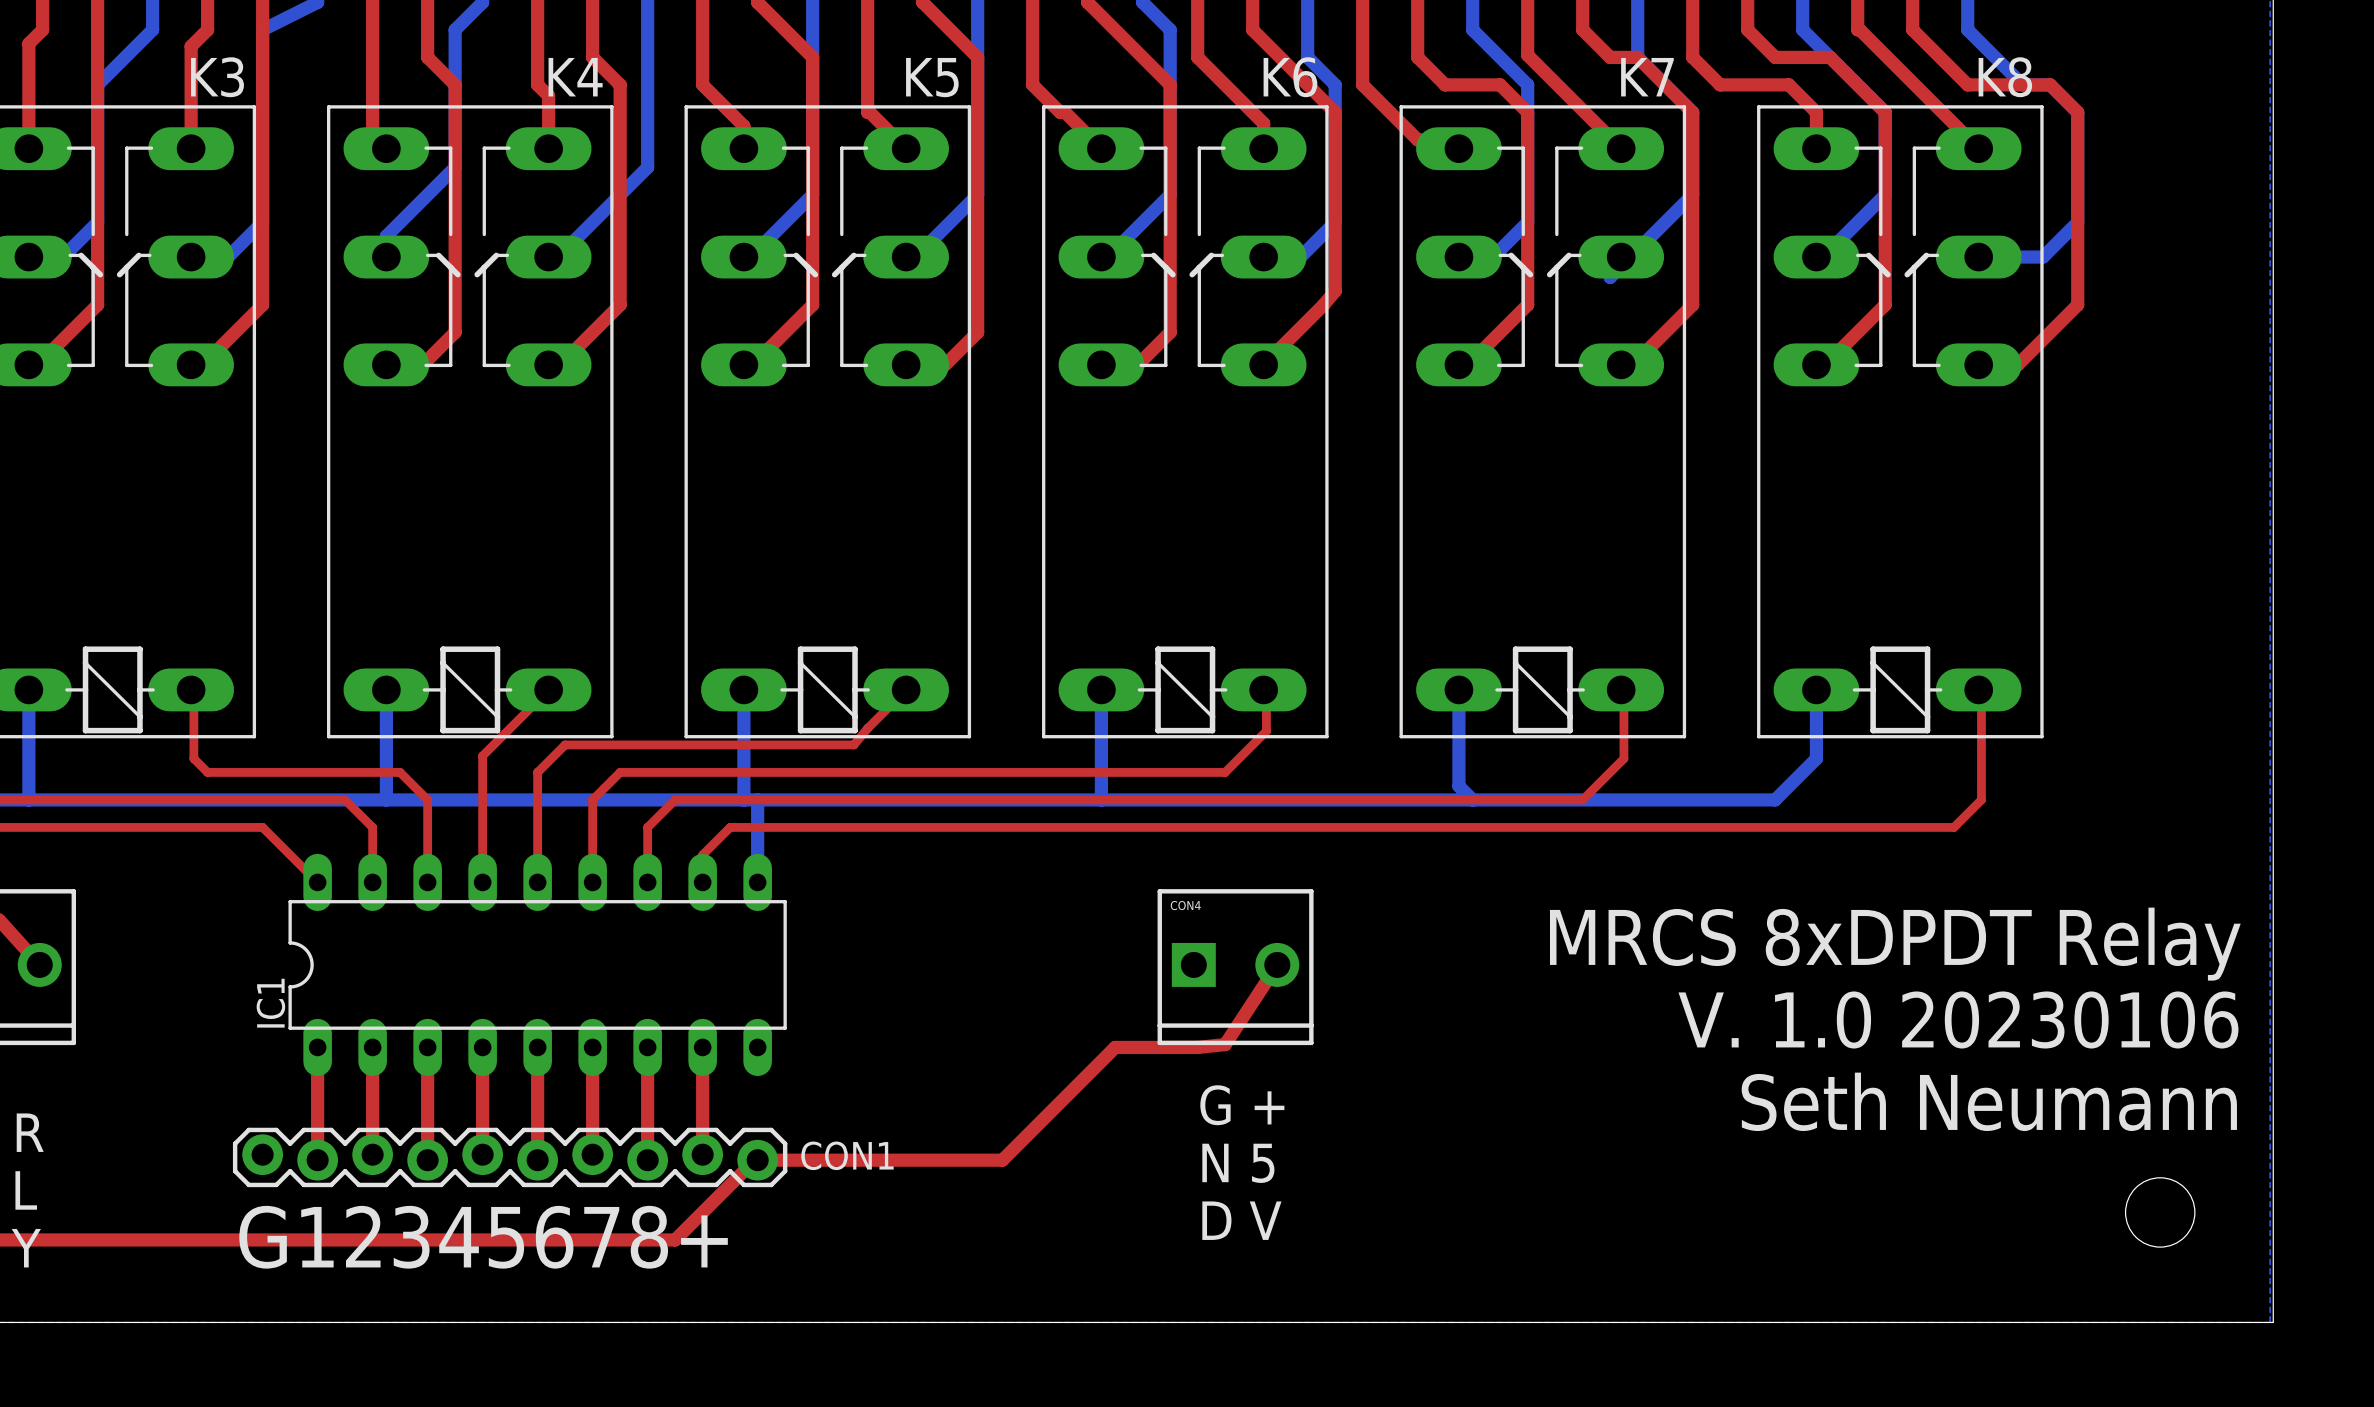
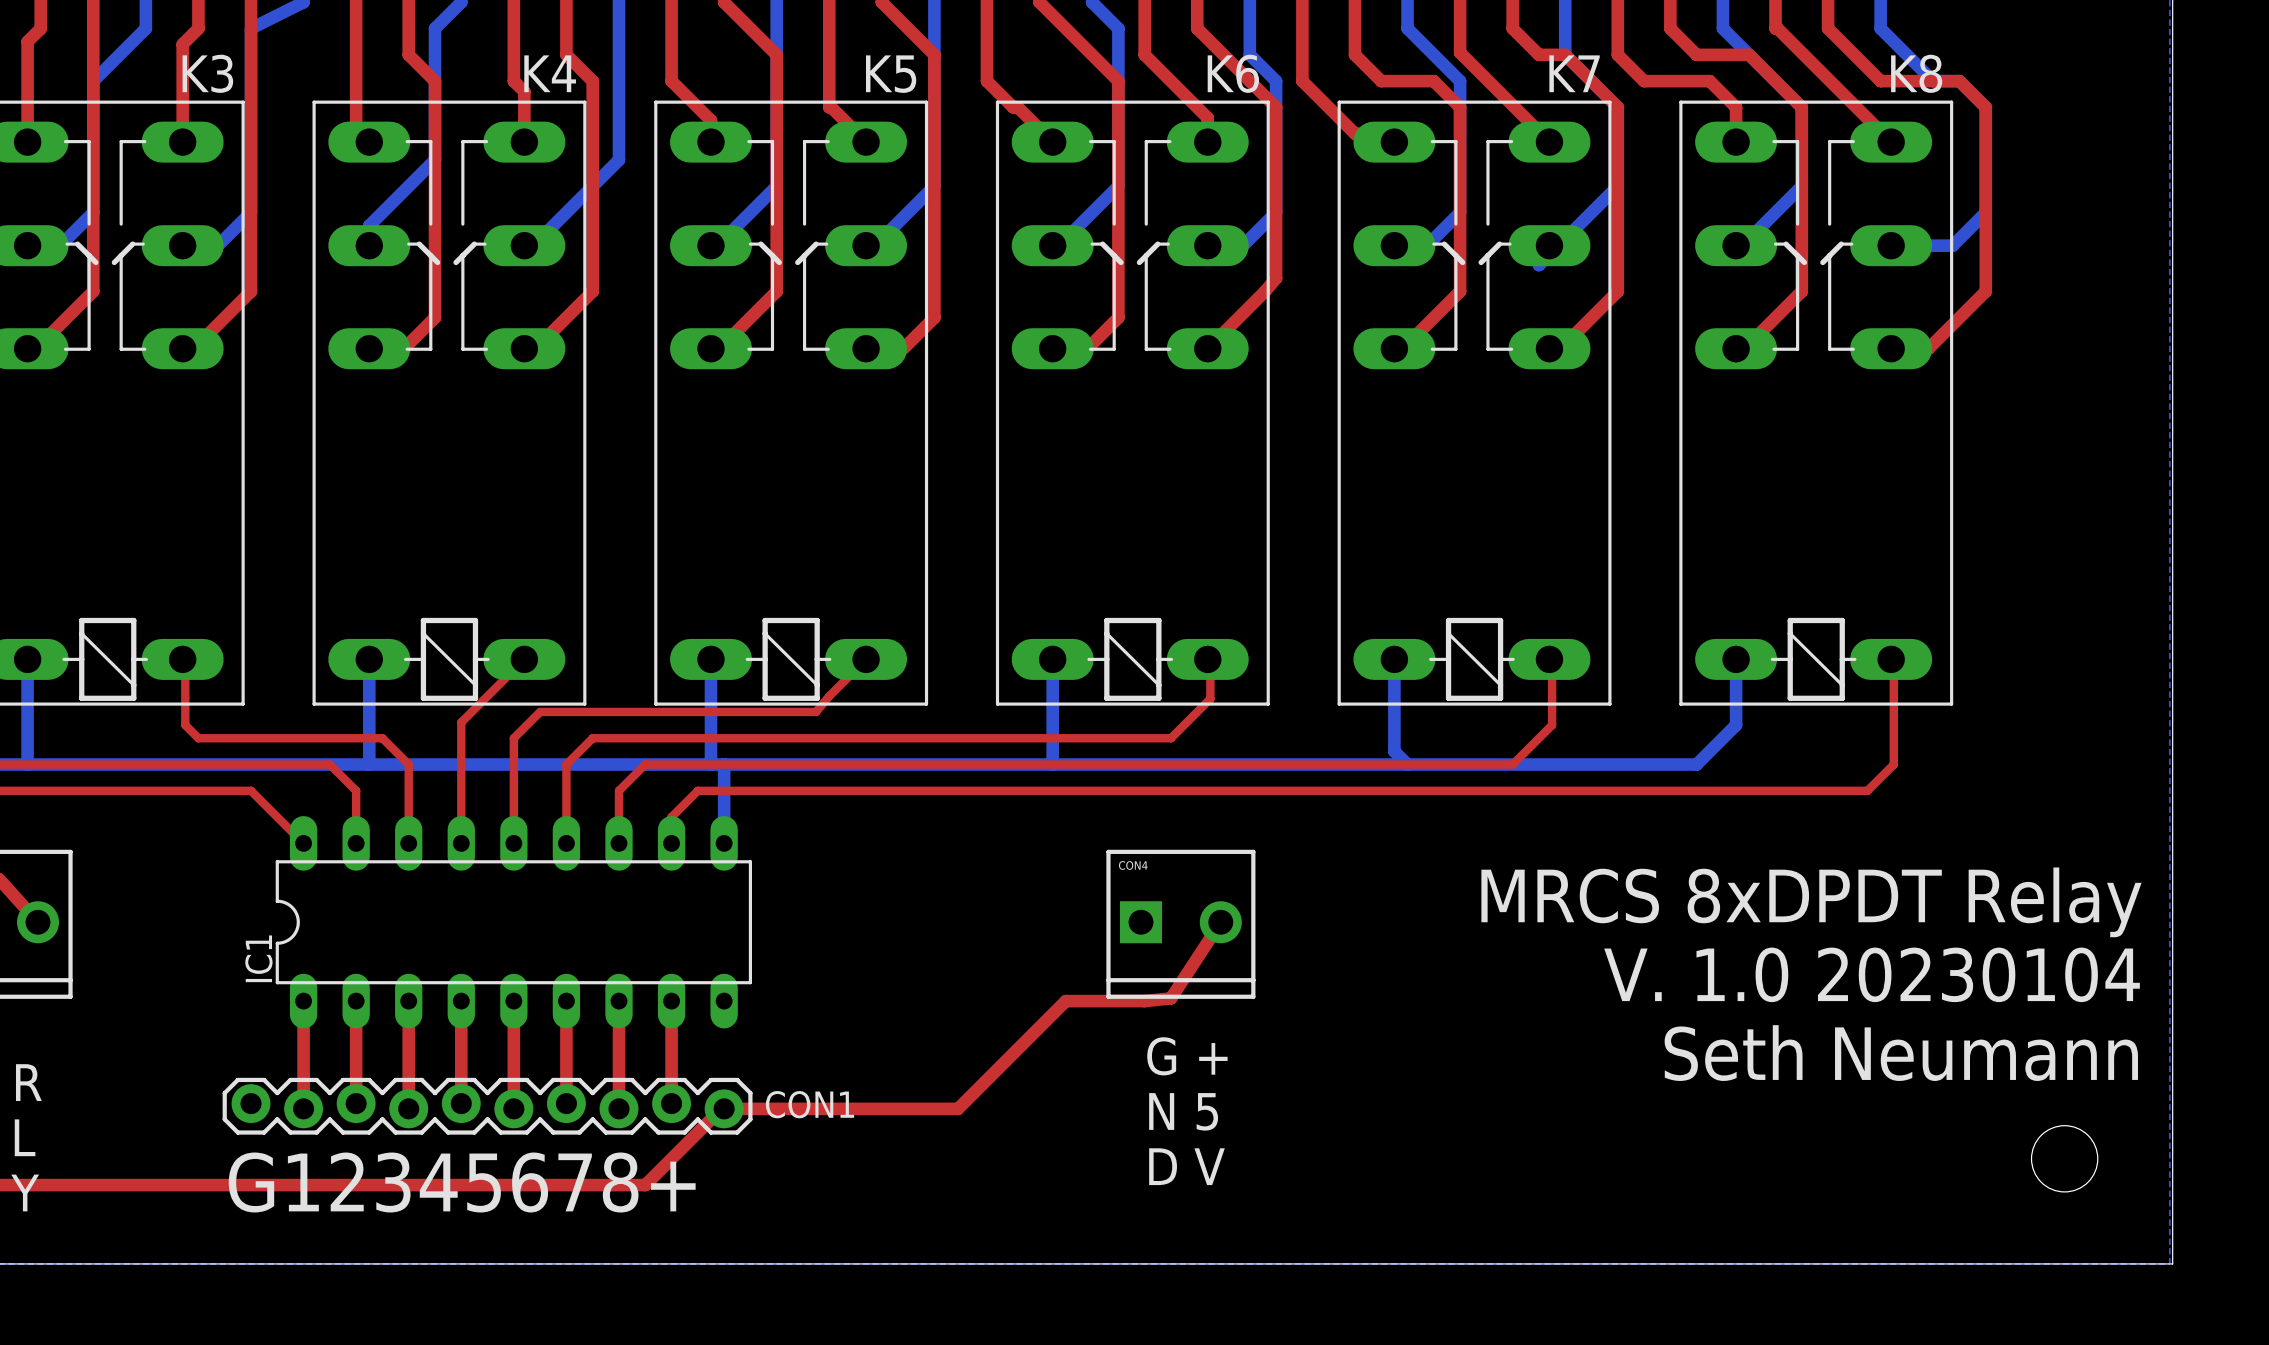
text: V. 1.0 20230106 (1958, 1019) -> V. 1.0 20230104 (1872, 974)

